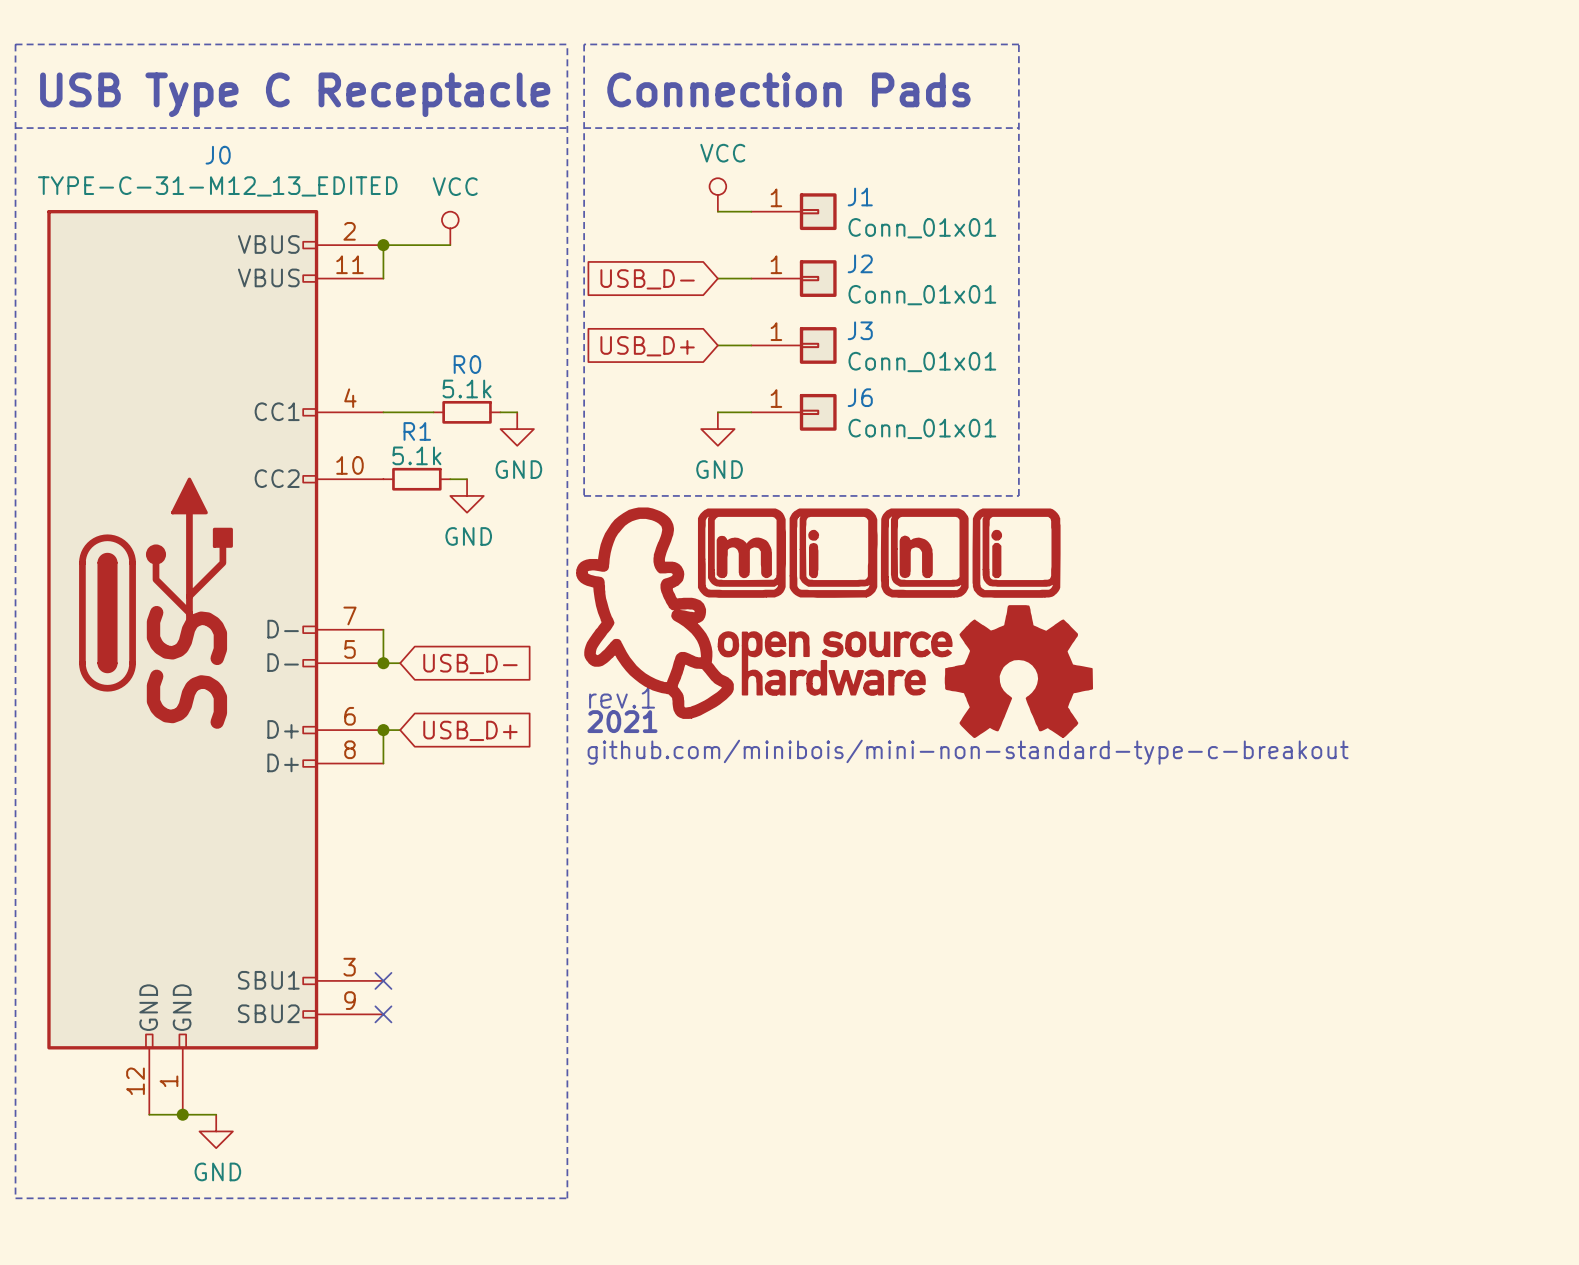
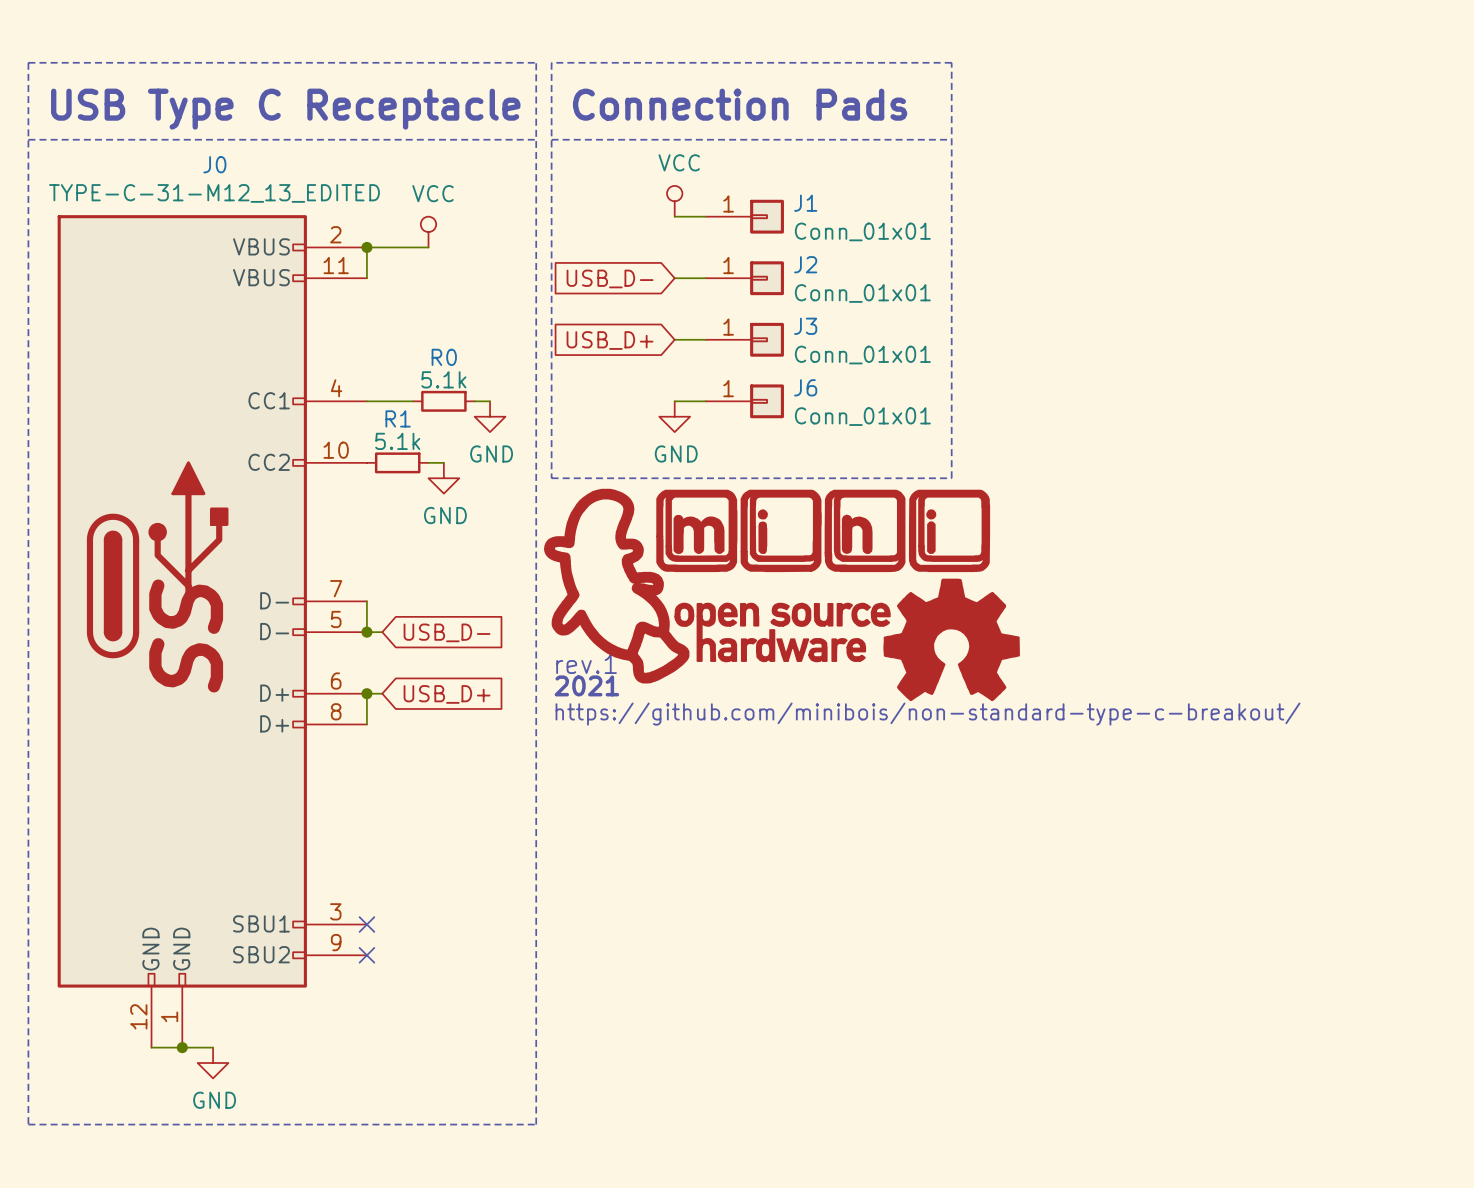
text: github.com/minibois/mini-non-standard-type-c-breakout (968, 752) -> https://github.com/minibois/non-standard-type-c-breakout/ (927, 714)

